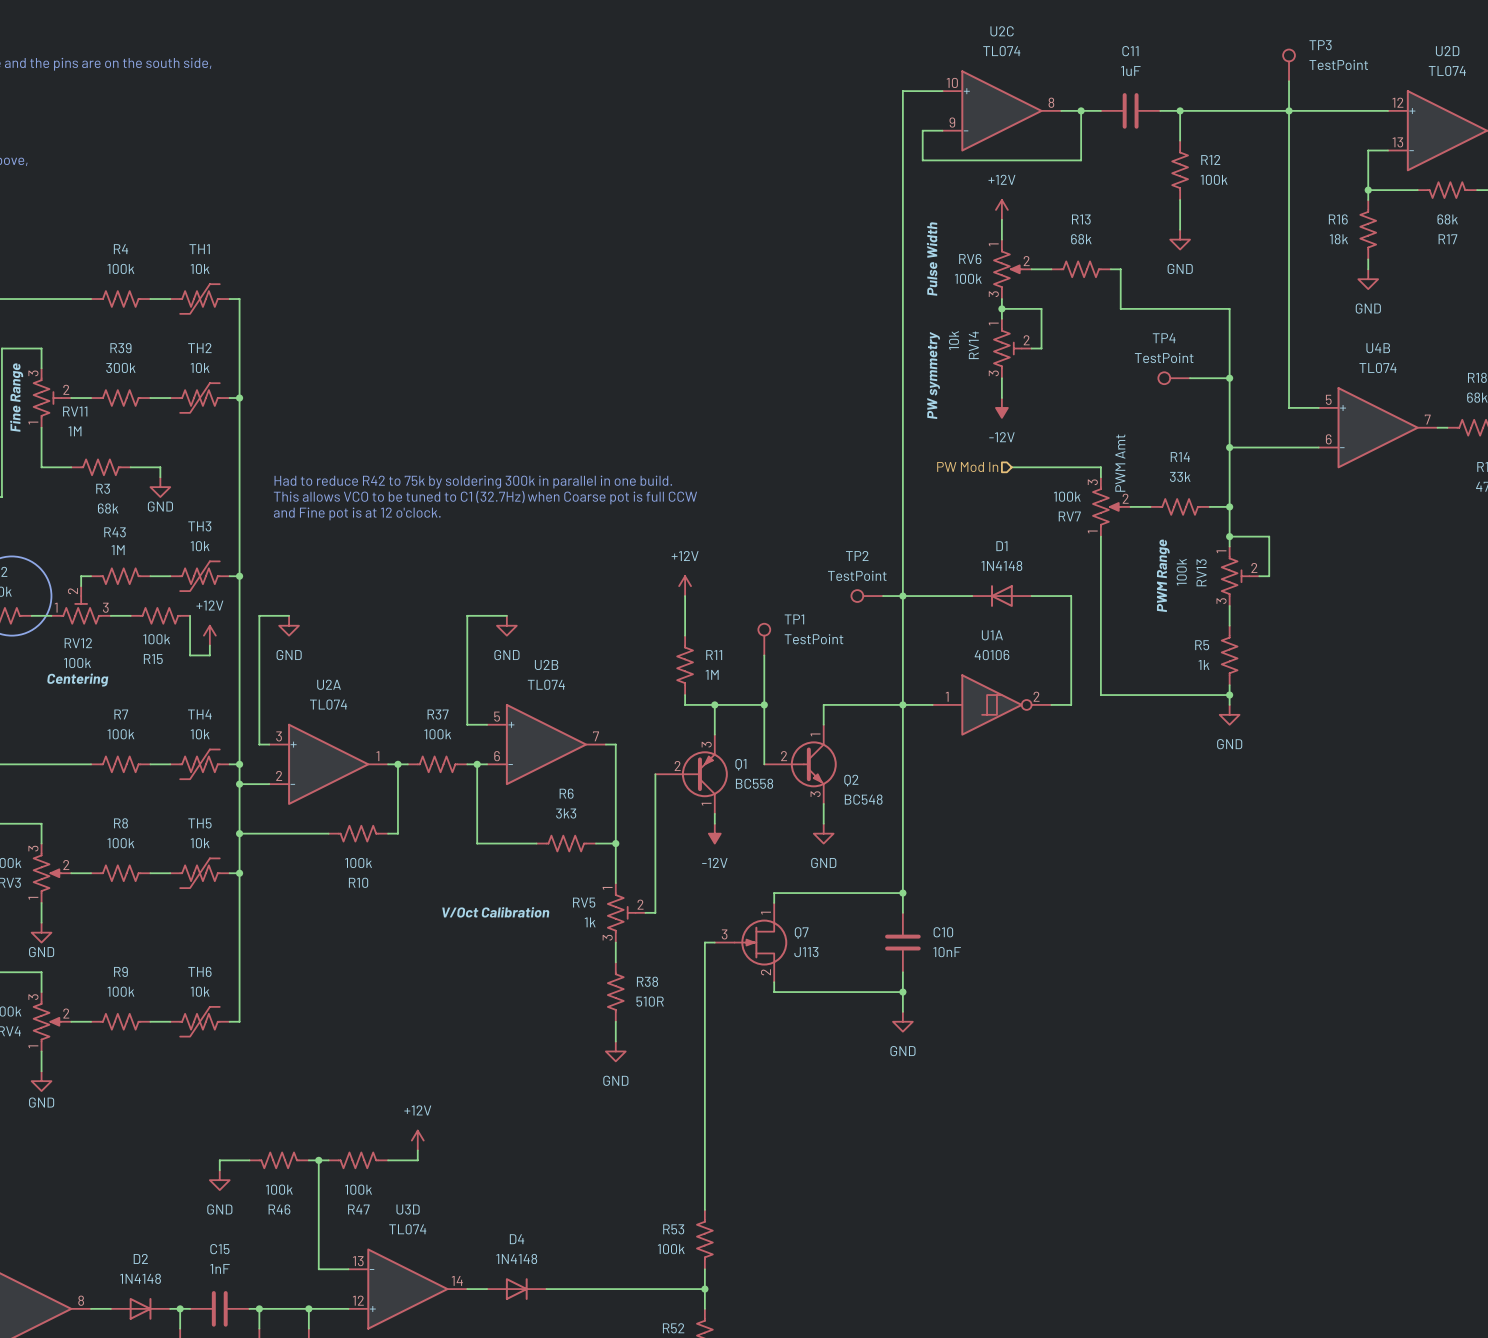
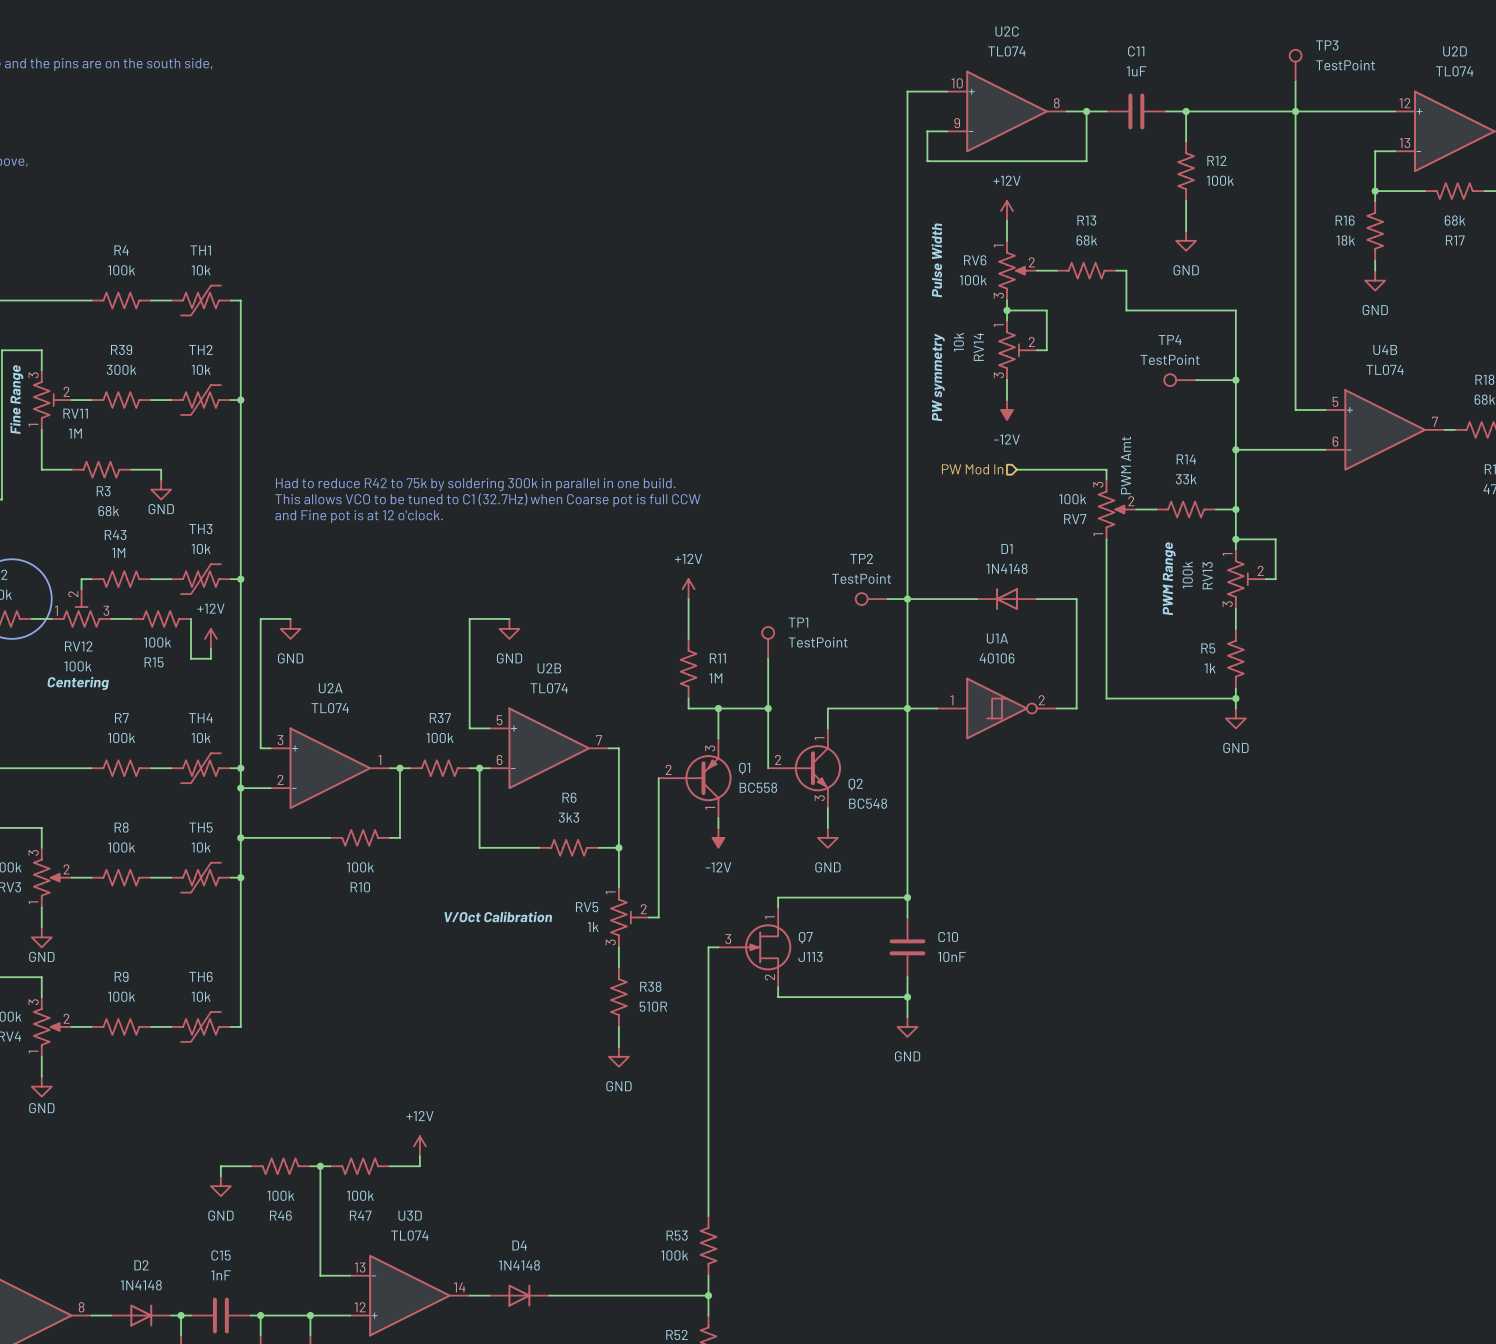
Q2 symbol: [764, 724, 837, 804] -> [768, 728, 842, 809]
Q1 symbol: [655, 734, 728, 814] -> [658, 738, 732, 818]

